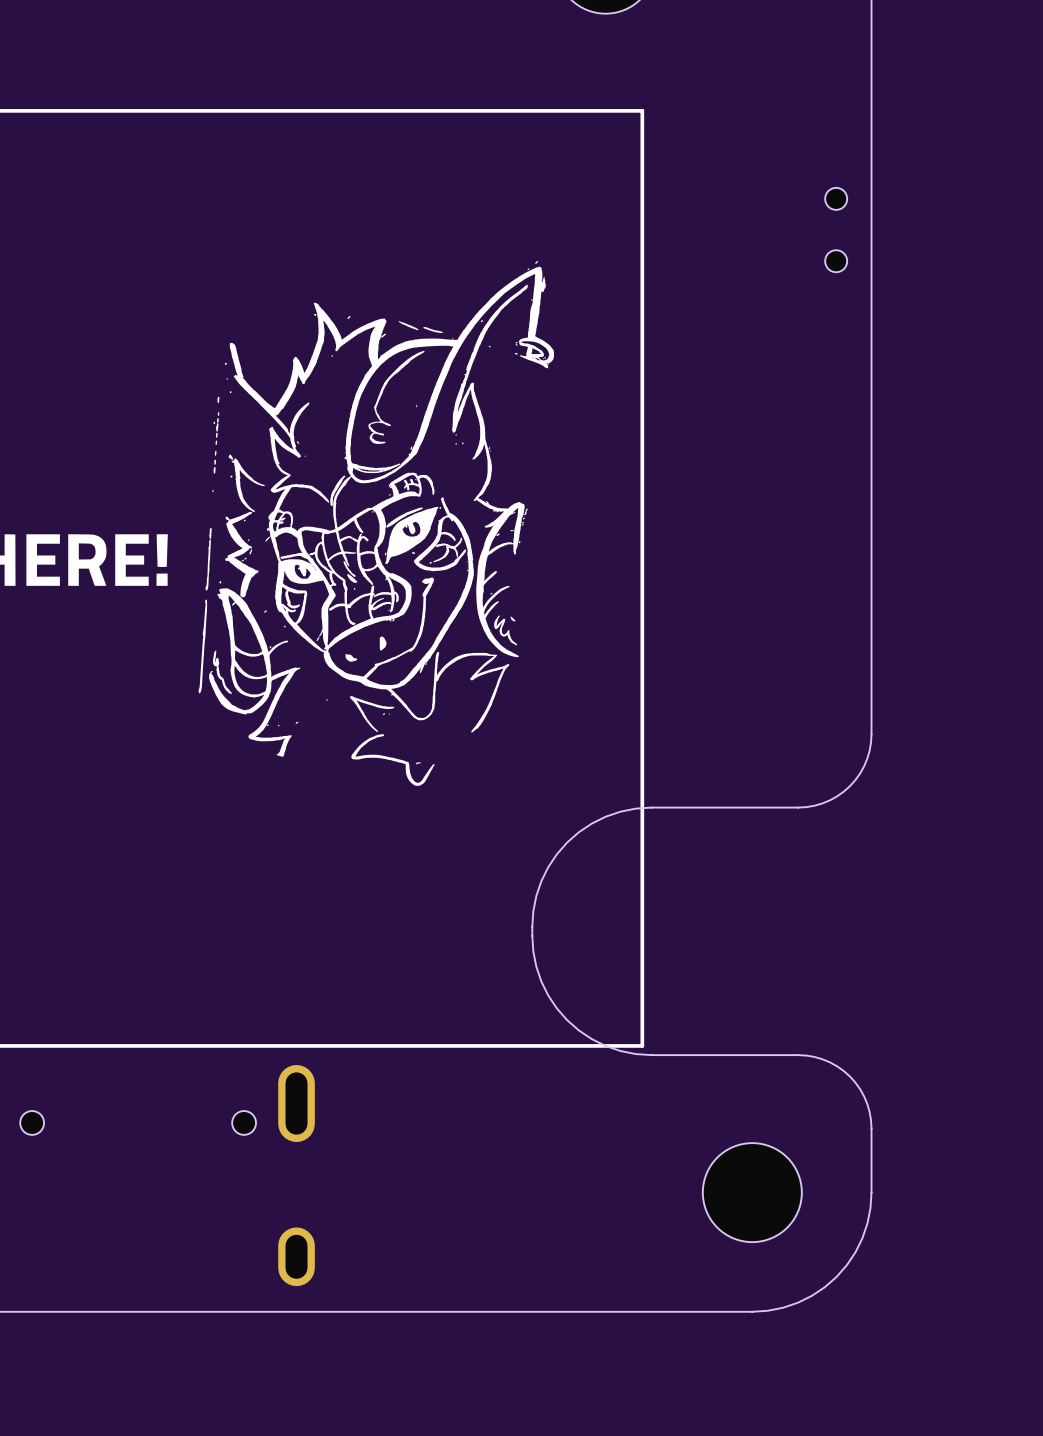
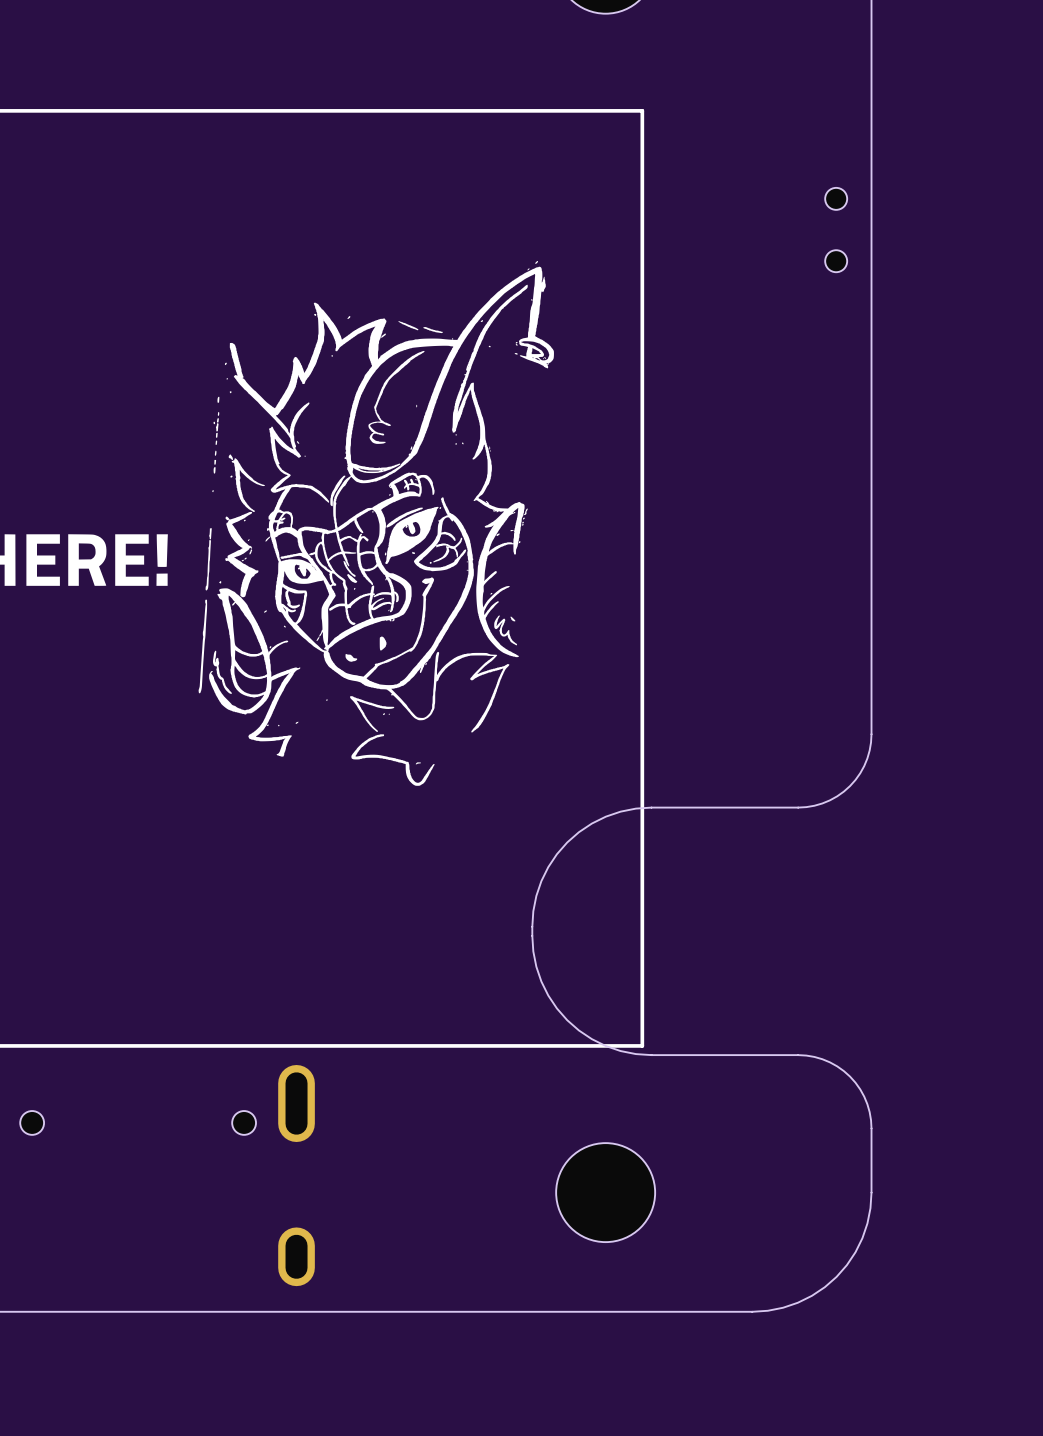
part position: (752, 1192) -> (605, 1192)

